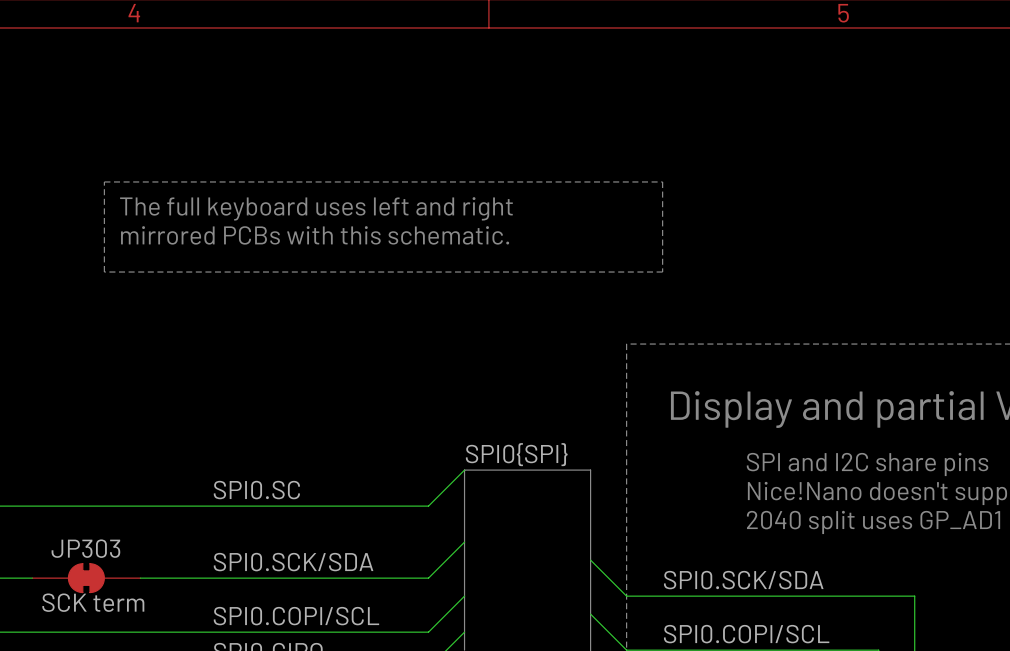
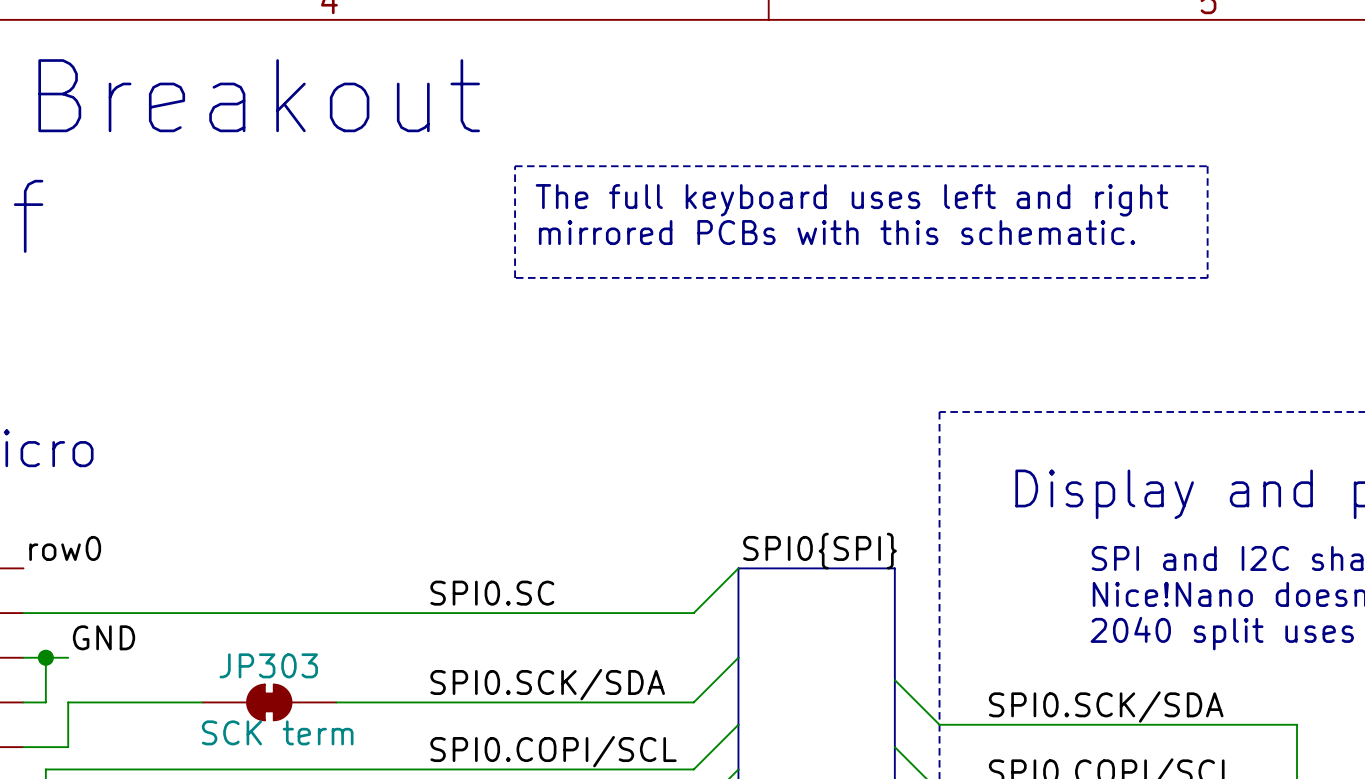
line: (104, 181) (662, 181) (662, 272) (104, 272) (104, 181) -> (515, 166) (1207, 166) (1207, 277) (515, 277) (515, 166)
text position: The full keyboard uses left and right (316, 208) -> The full keyboard uses left and right (851, 200)
text position: mirrored PCBs with this schematic. (315, 235) -> mirrored PCBs with this schematic. (837, 232)

